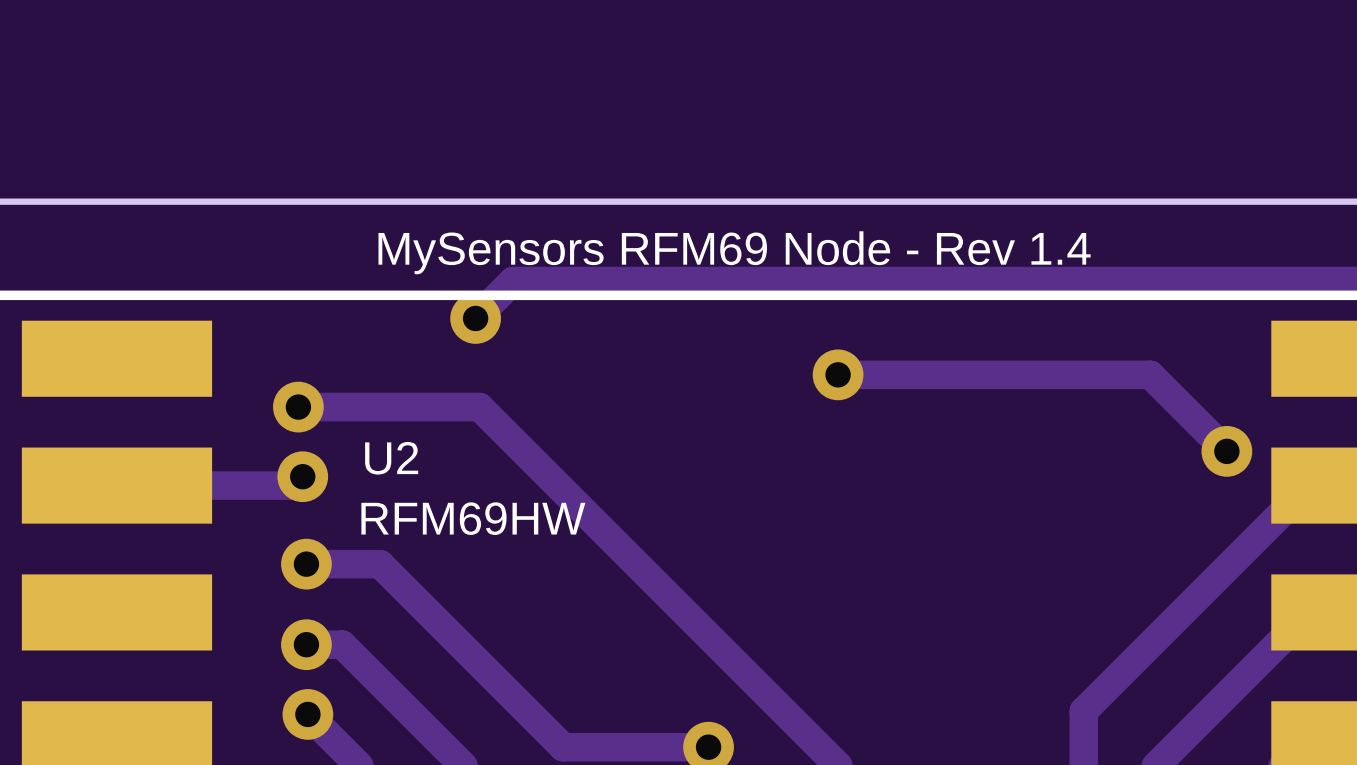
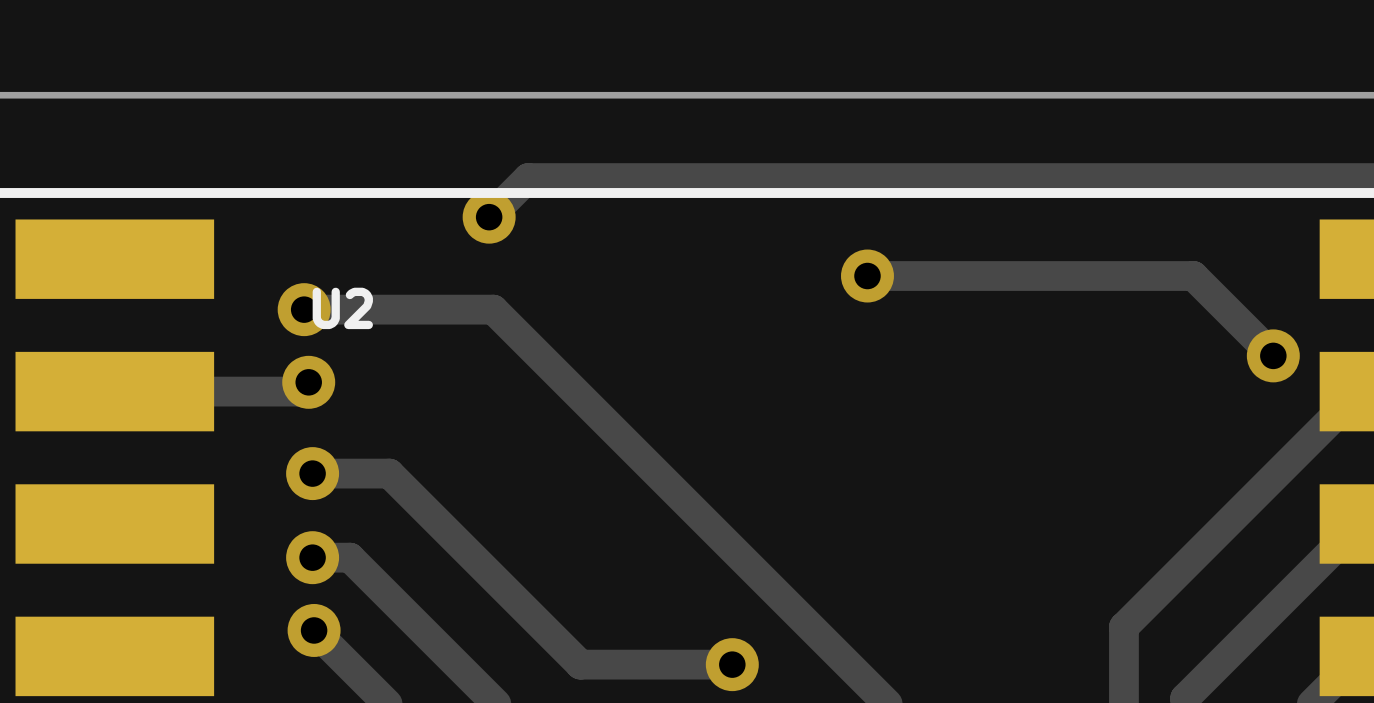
text: MySensors RFM69 Node - Rev 1.4 (734, 252) -> none
U2 name position: U2 (391, 458) -> U2 (342, 308)
U2 value: RFM69HW (473, 518) -> none

